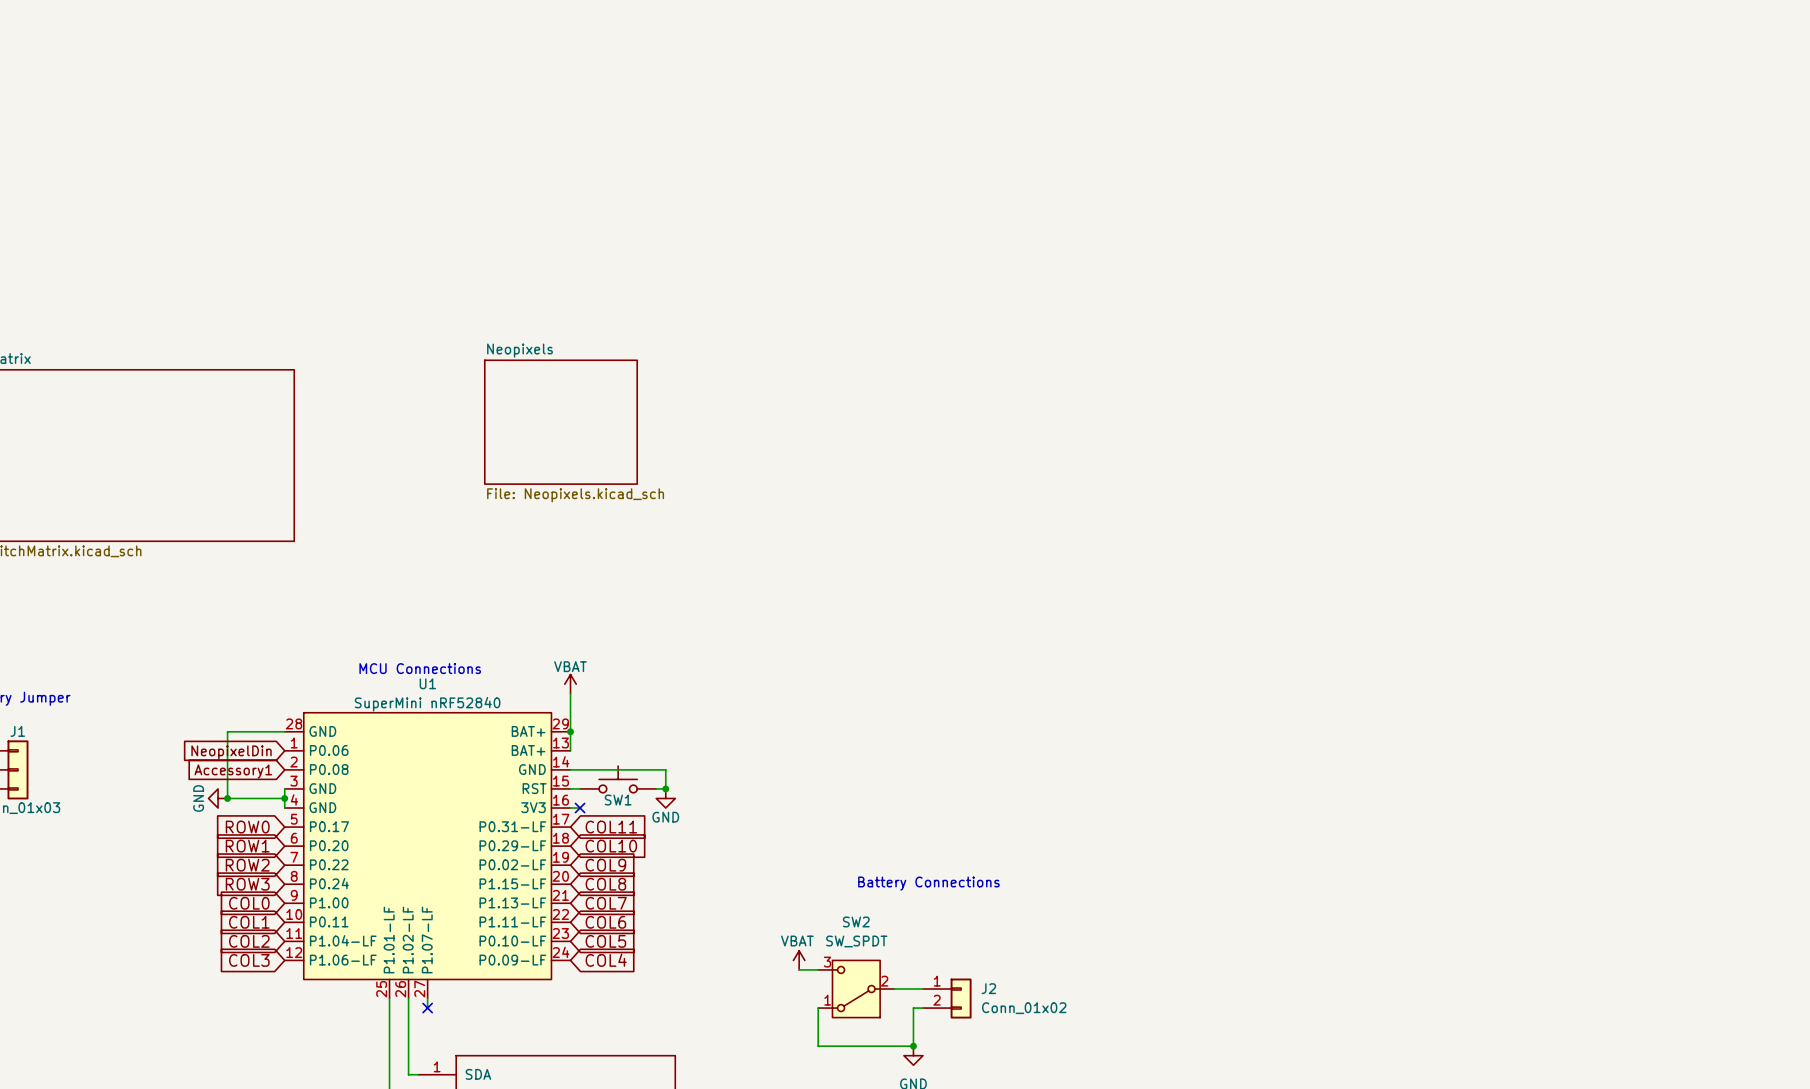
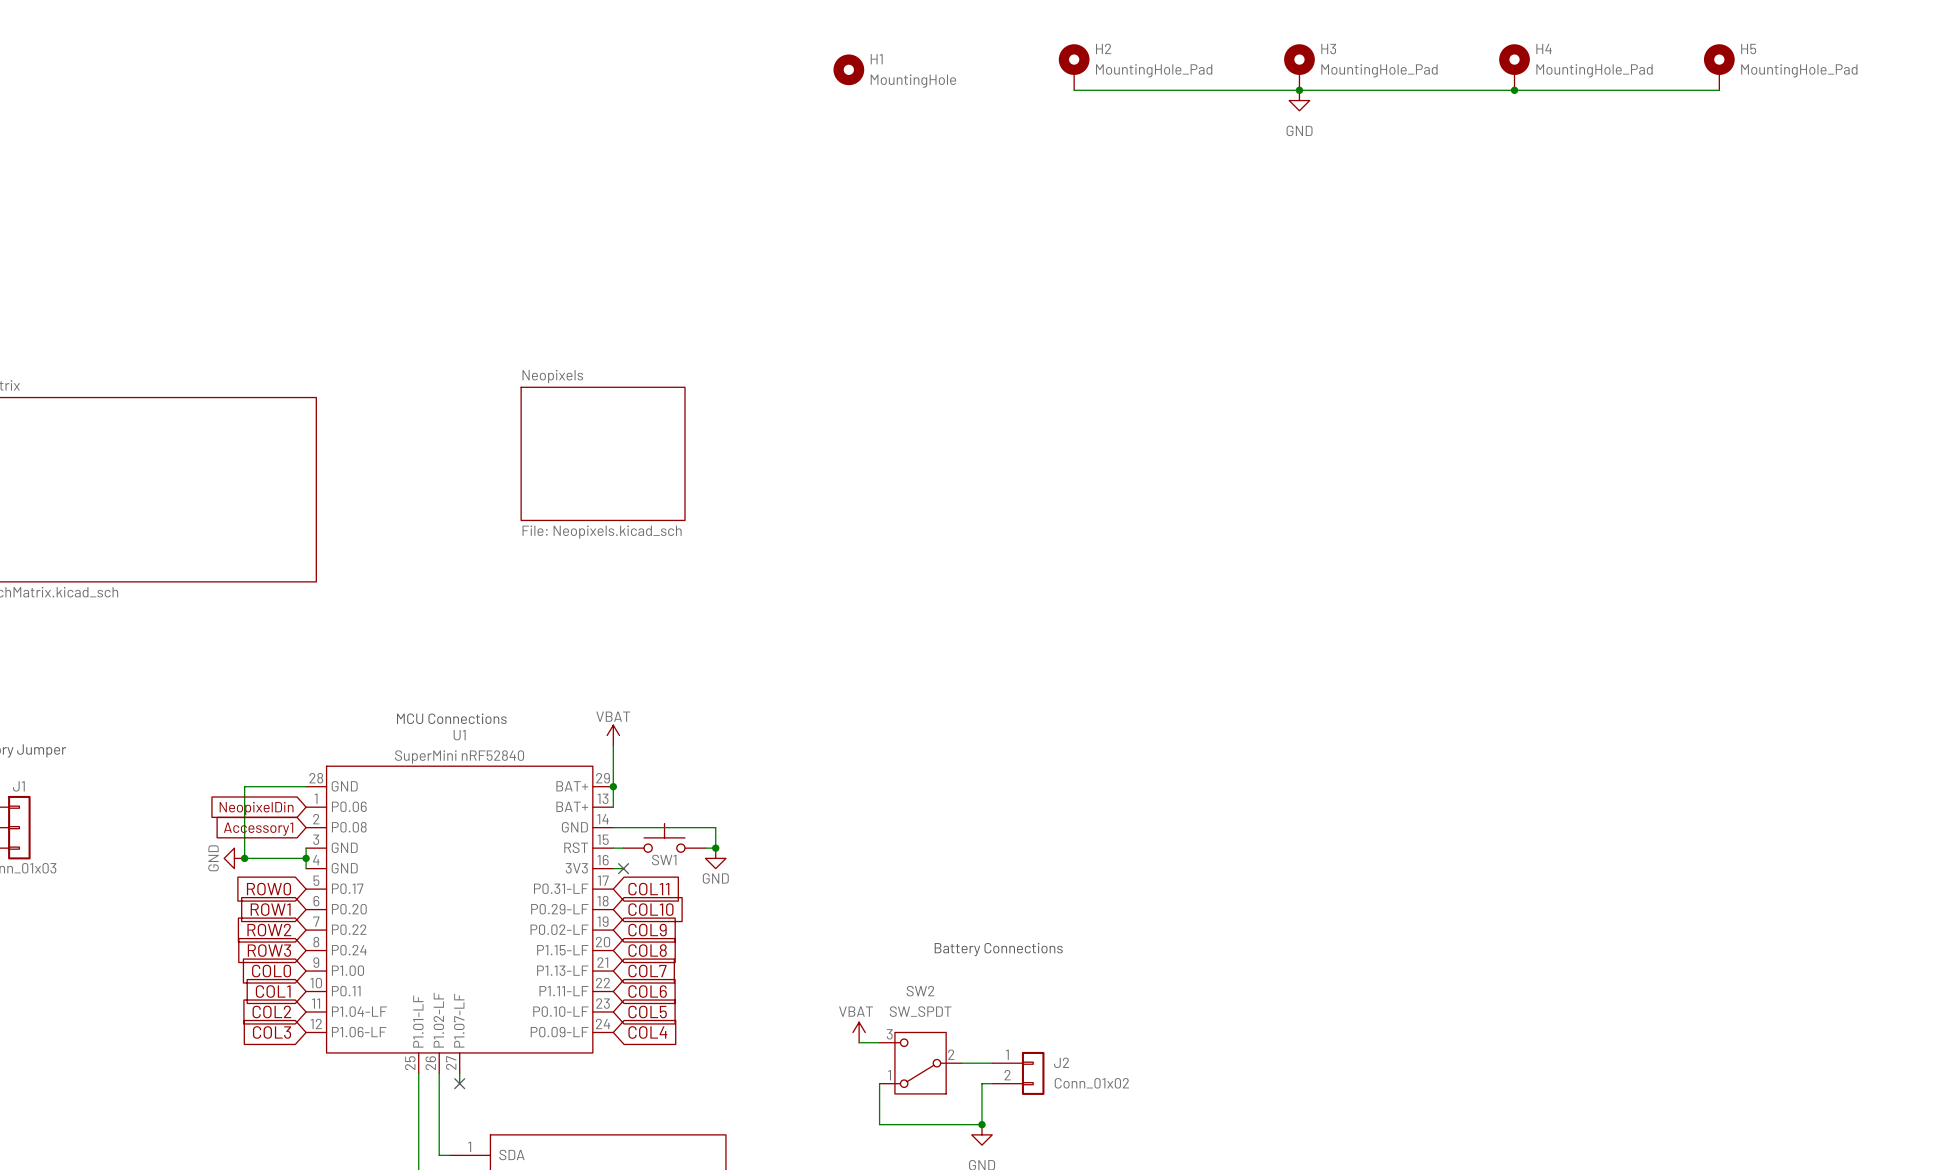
H2: none -> MountingHole_Pad (1074, 67)
H3: none -> MountingHole_Pad (1299, 67)
H4: none -> MountingHole_Pad (1514, 67)
H5: none -> MountingHole_Pad (1719, 67)
H1: none -> MountingHole (848, 69)
wire: none -> (1074, 90) (1719, 90)
junction: none -> (1299, 90)
junction: none -> (1514, 90)
power symbol: none -> GND (1299, 100)

